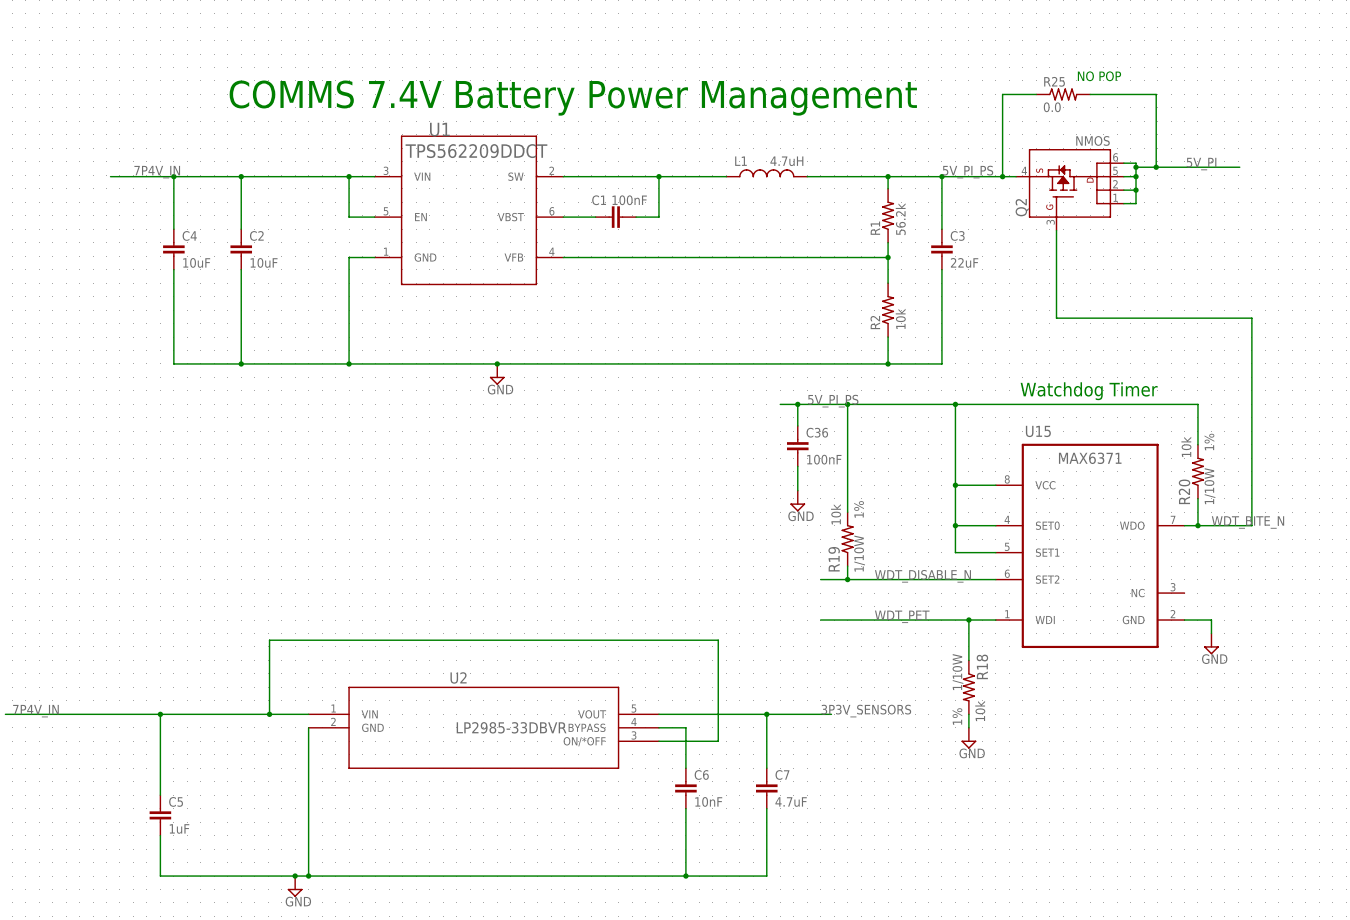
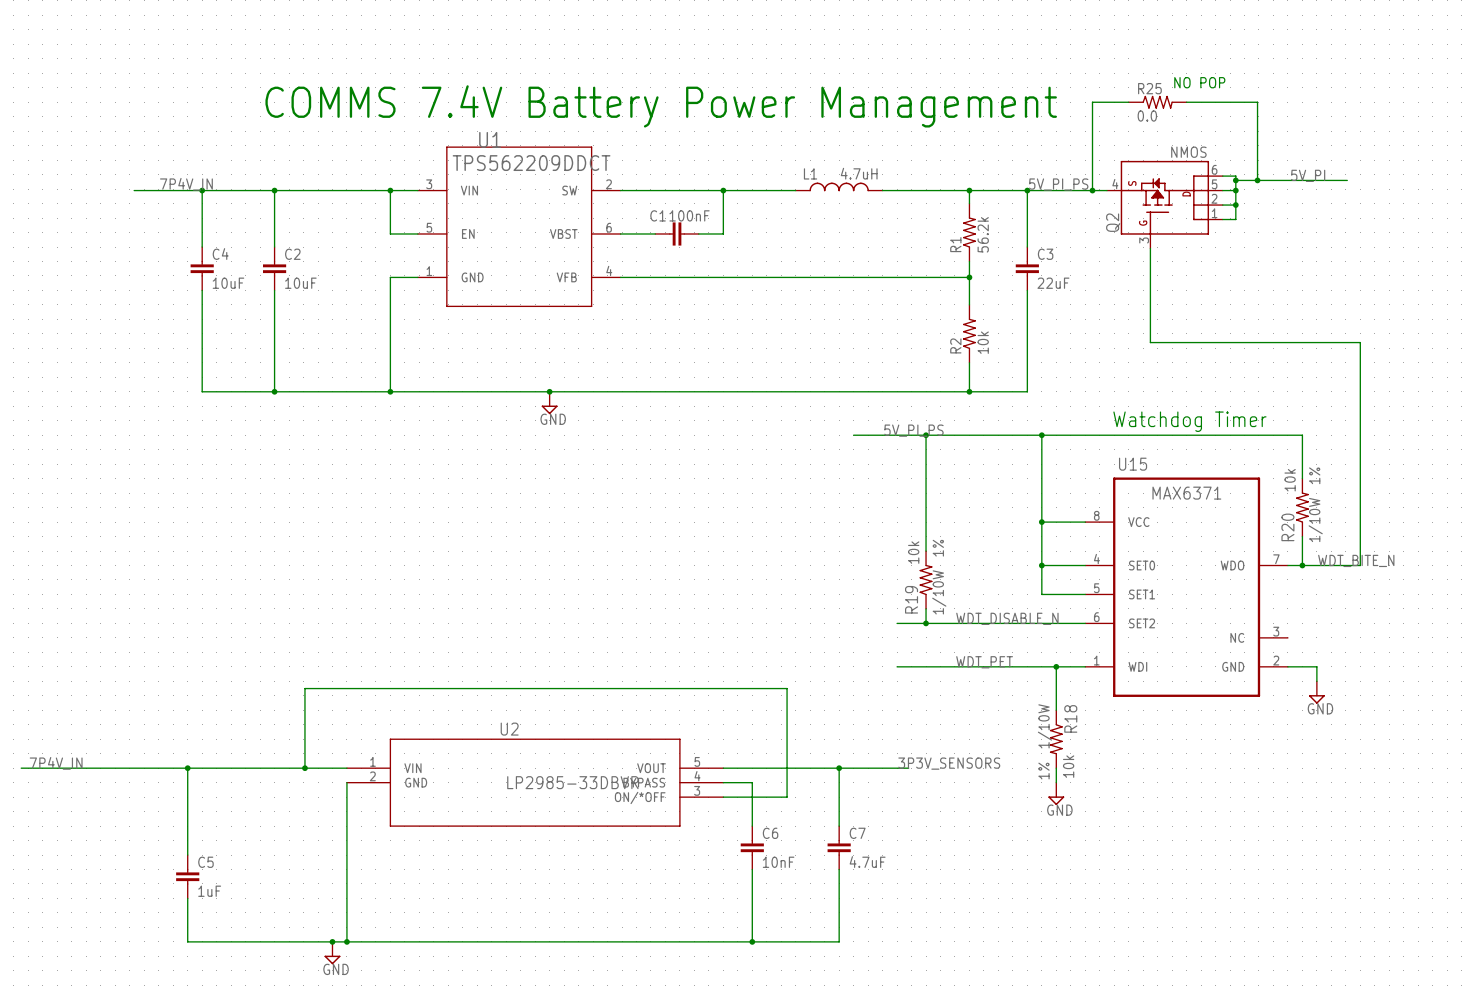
wire: (797, 404) (797, 425) -> none
junction: (797, 404) -> none
C36: 100nF (797, 446) -> none
wire: (797, 466) (797, 490) -> none
power symbol: GND (797, 501) -> none

